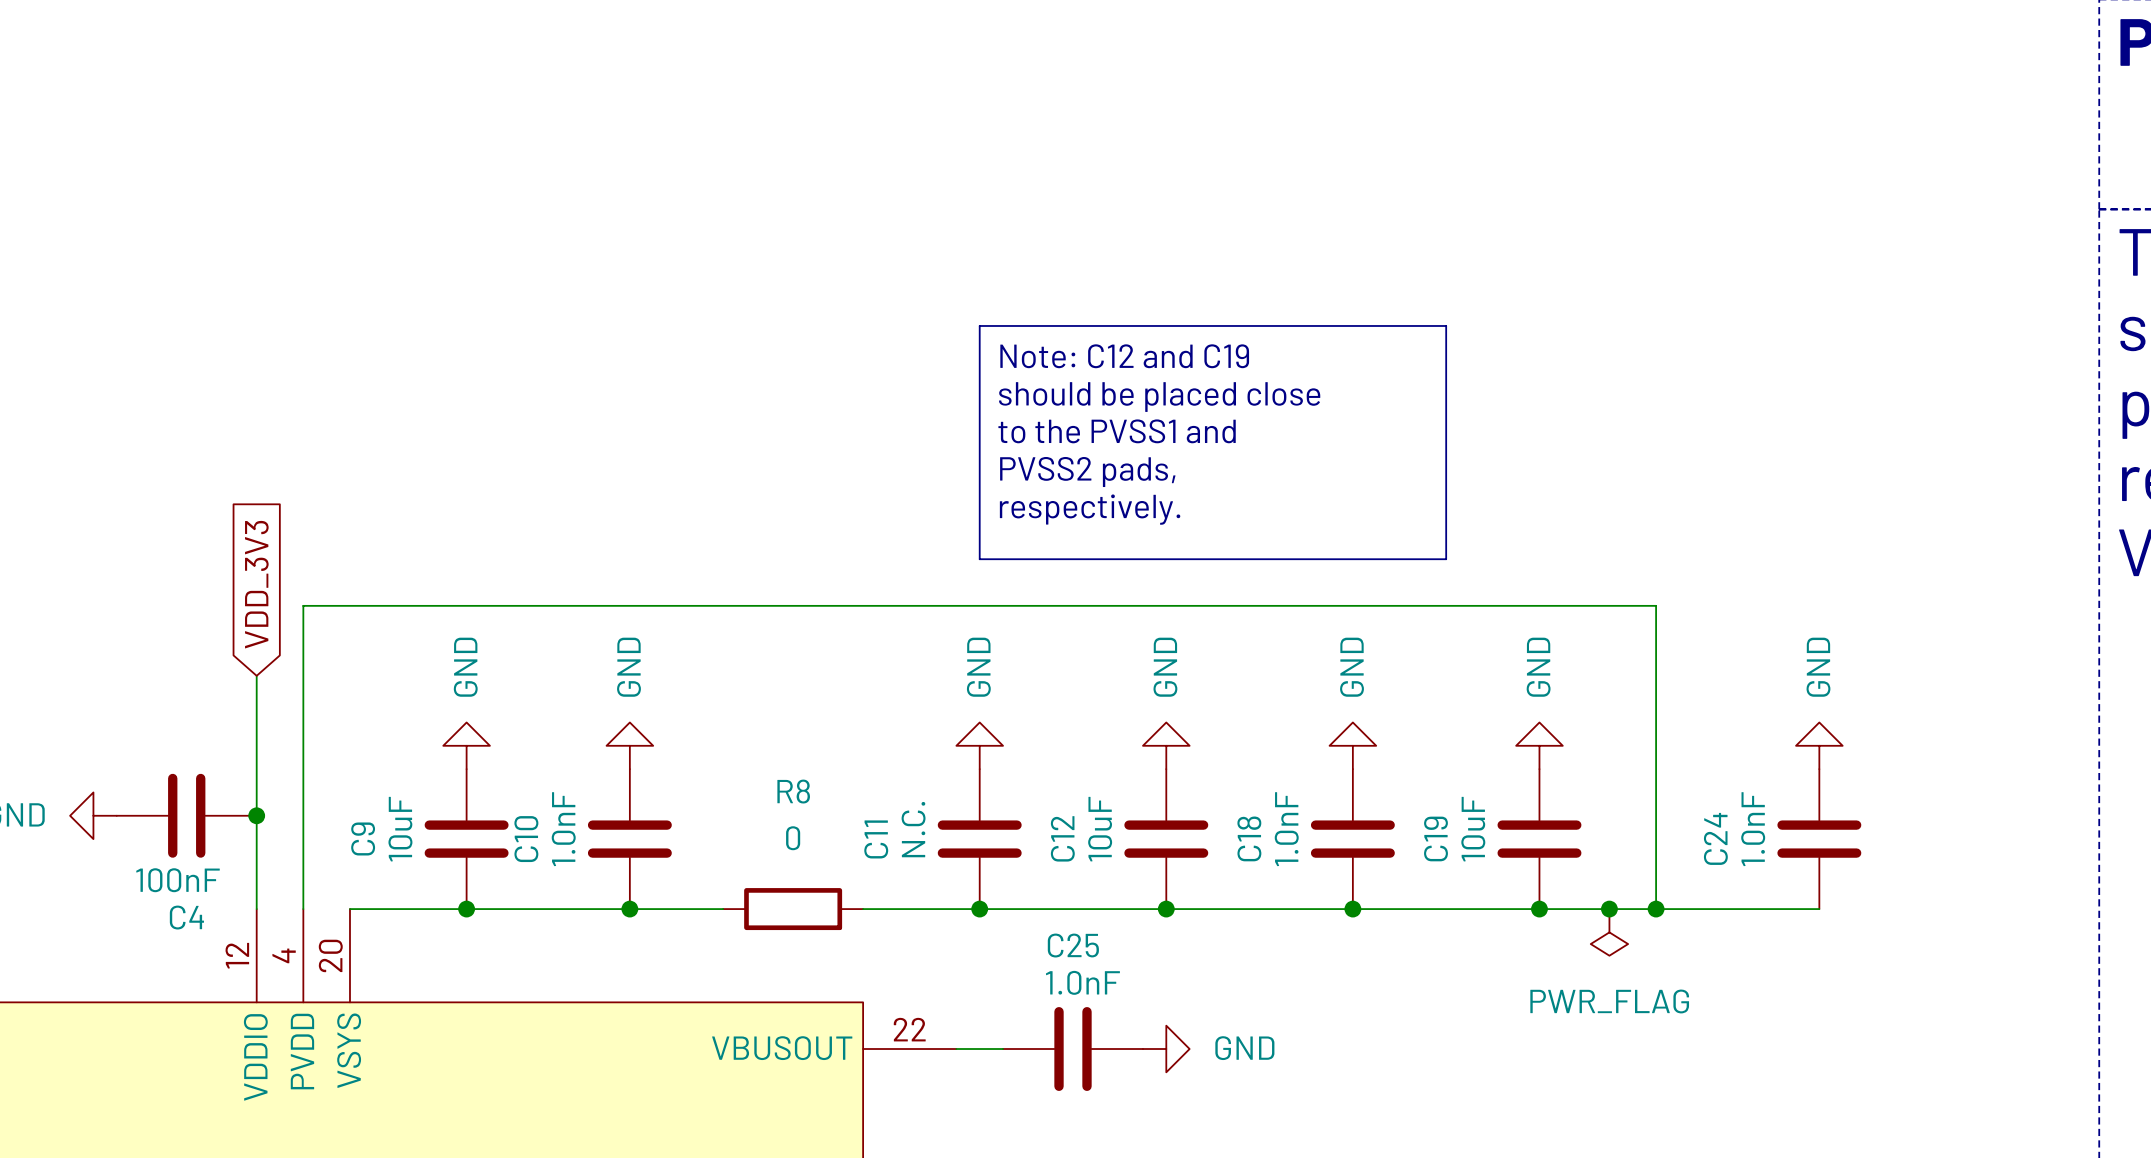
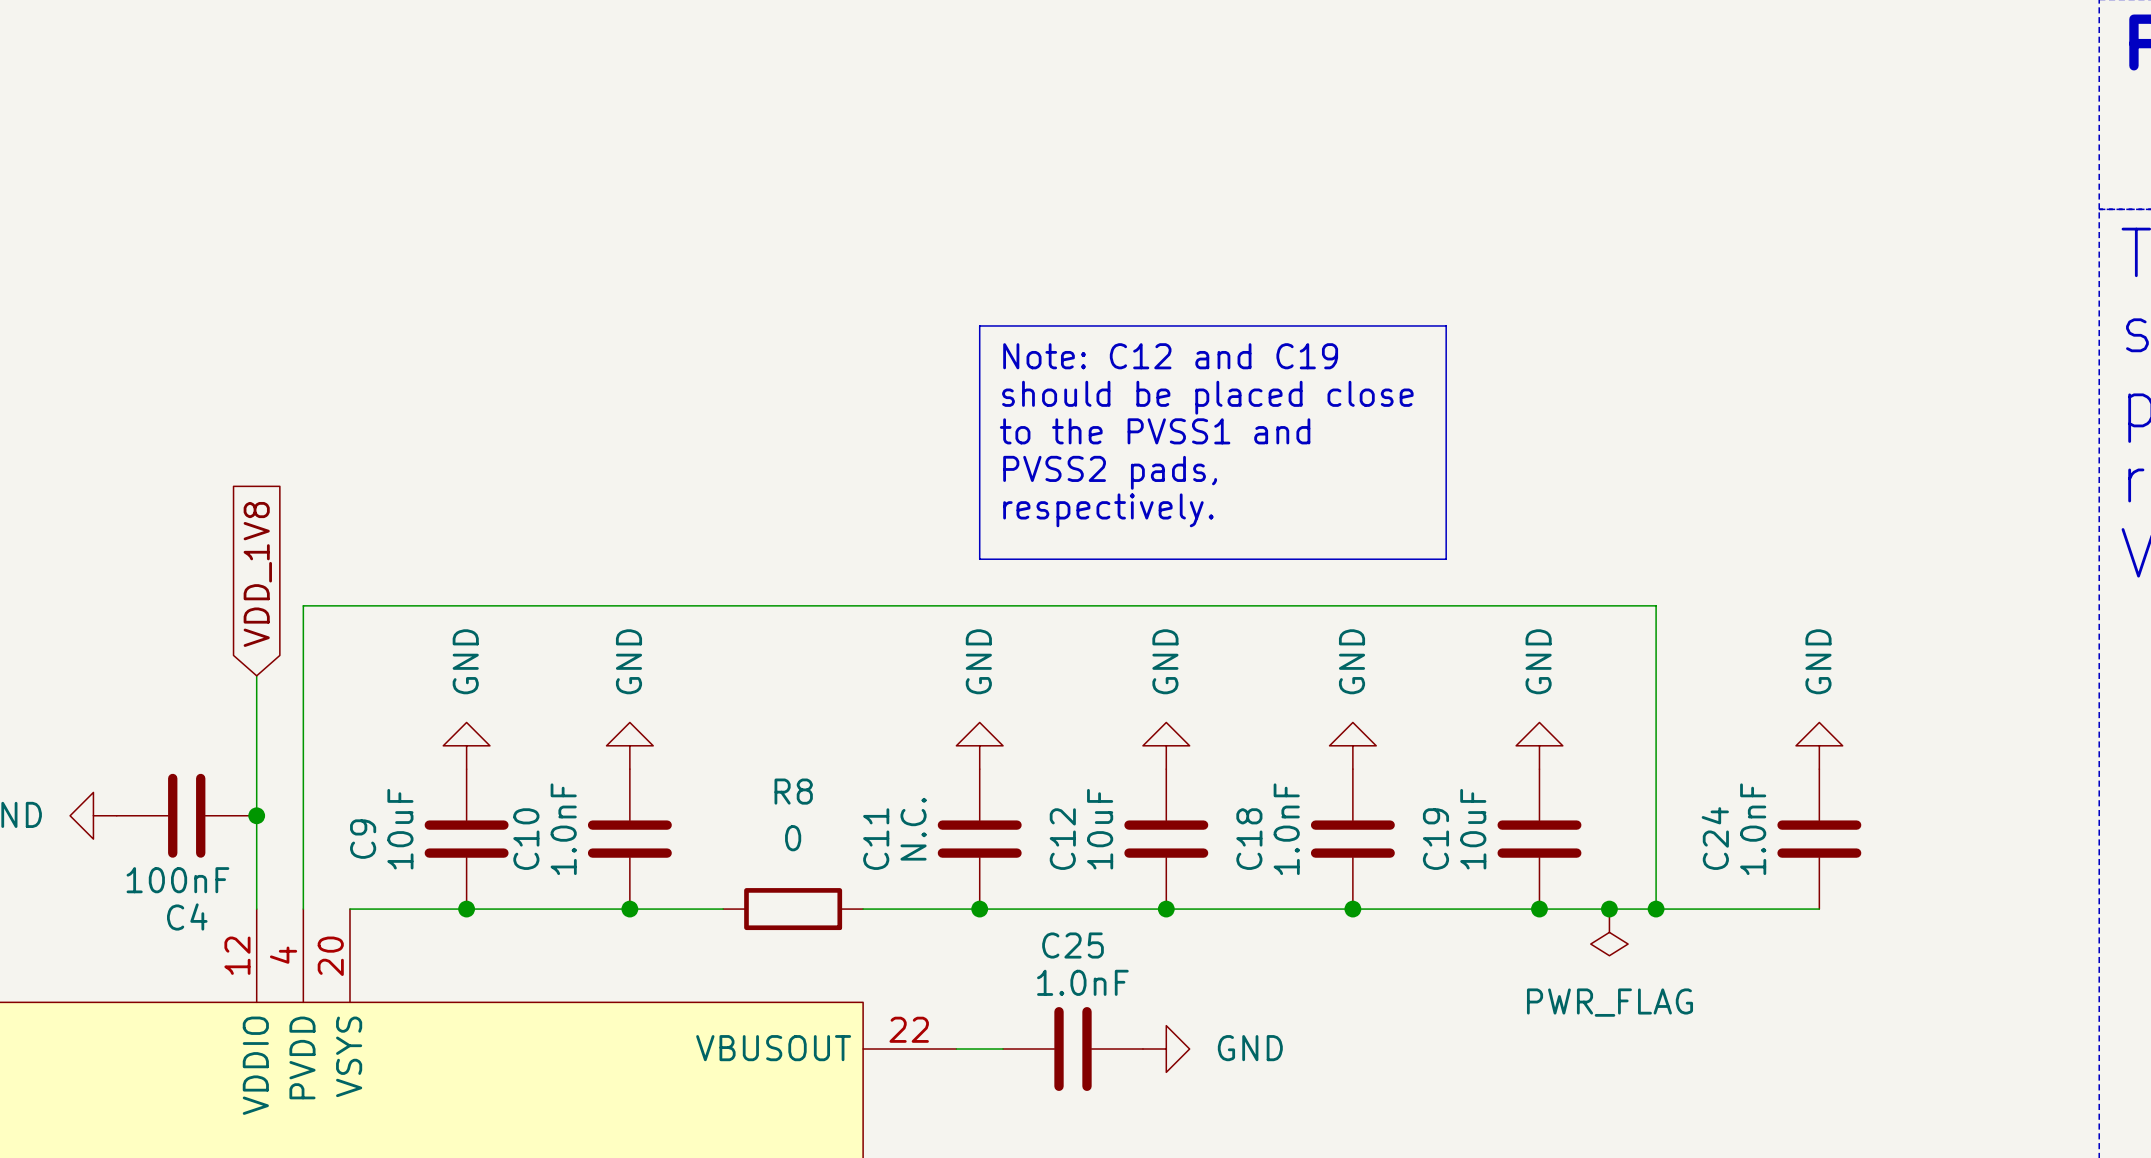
global label: VDD_3V3 (256, 584) -> VDD_1V8 (257, 574)

